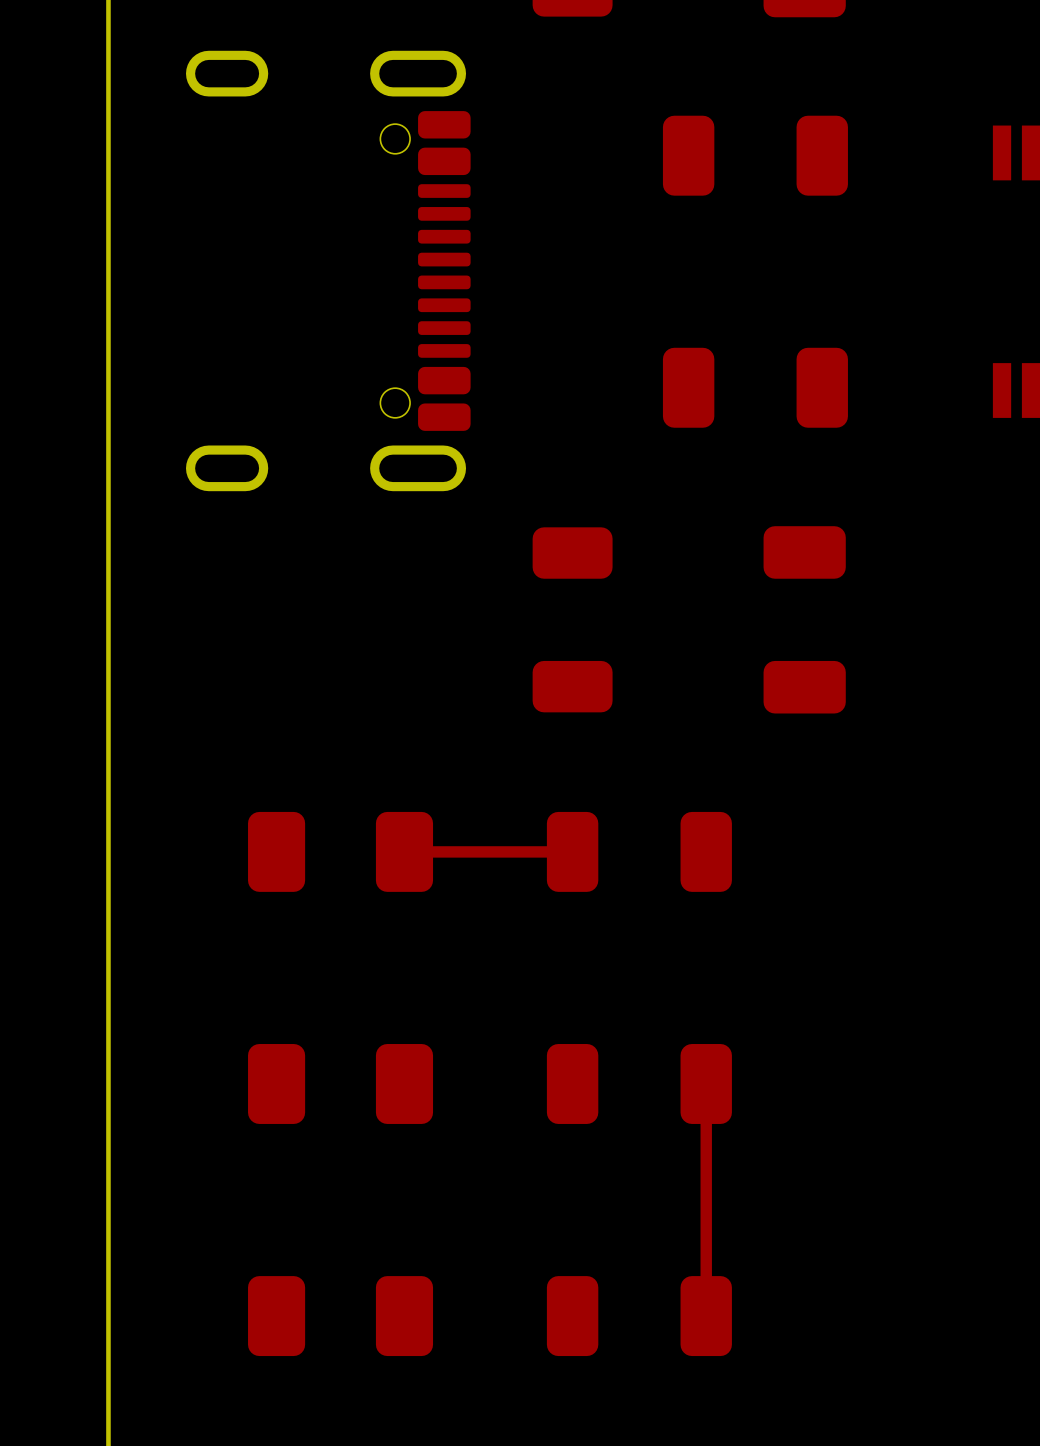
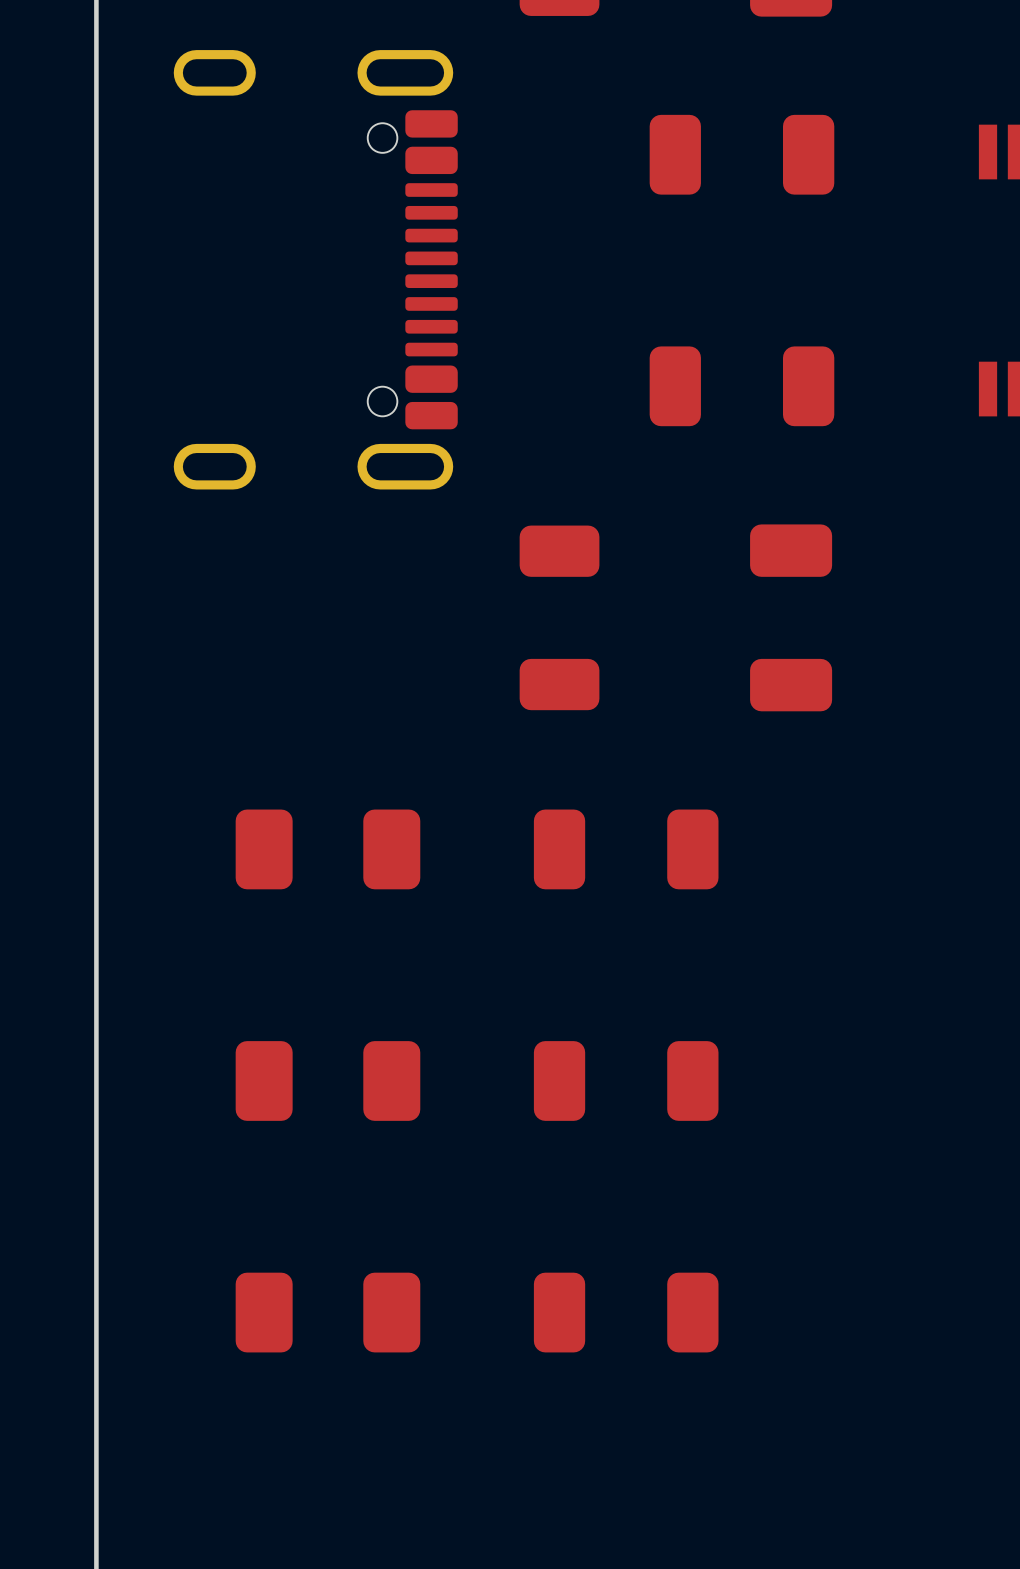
top track: (572, 851) (404, 851) -> none
top track: (706, 1083) (706, 1316) -> none

